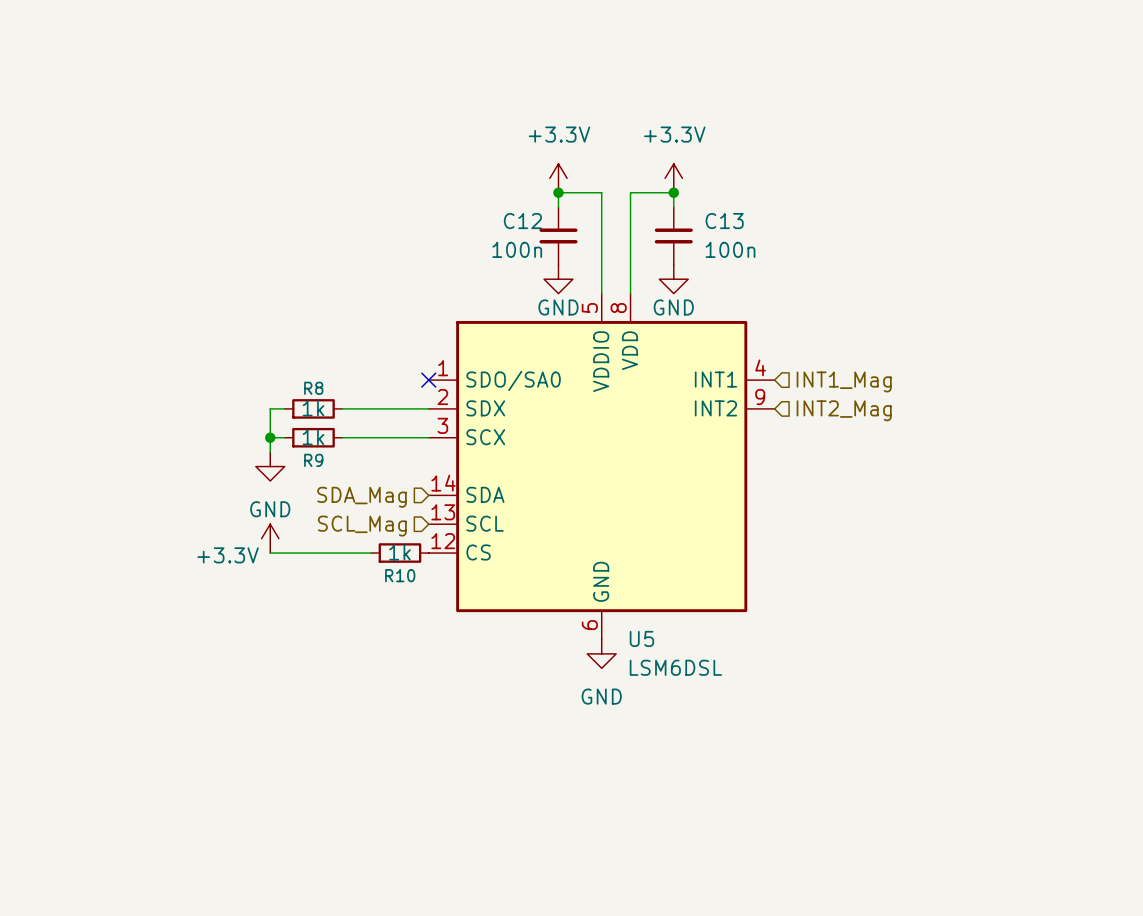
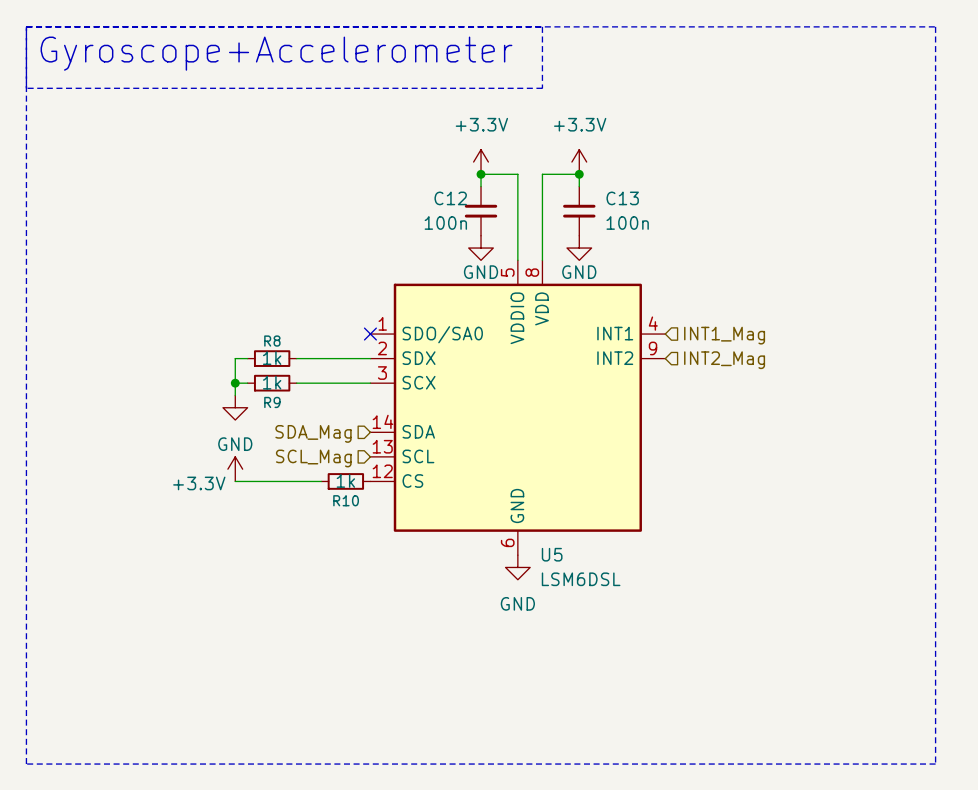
line: none -> (26, 26) (935, 26) (935, 764) (26, 764) (26, 26)
line: none -> (542, 26) (542, 88) (26, 88)
text: none -> Gyroscope+Accelerometer (276, 53)

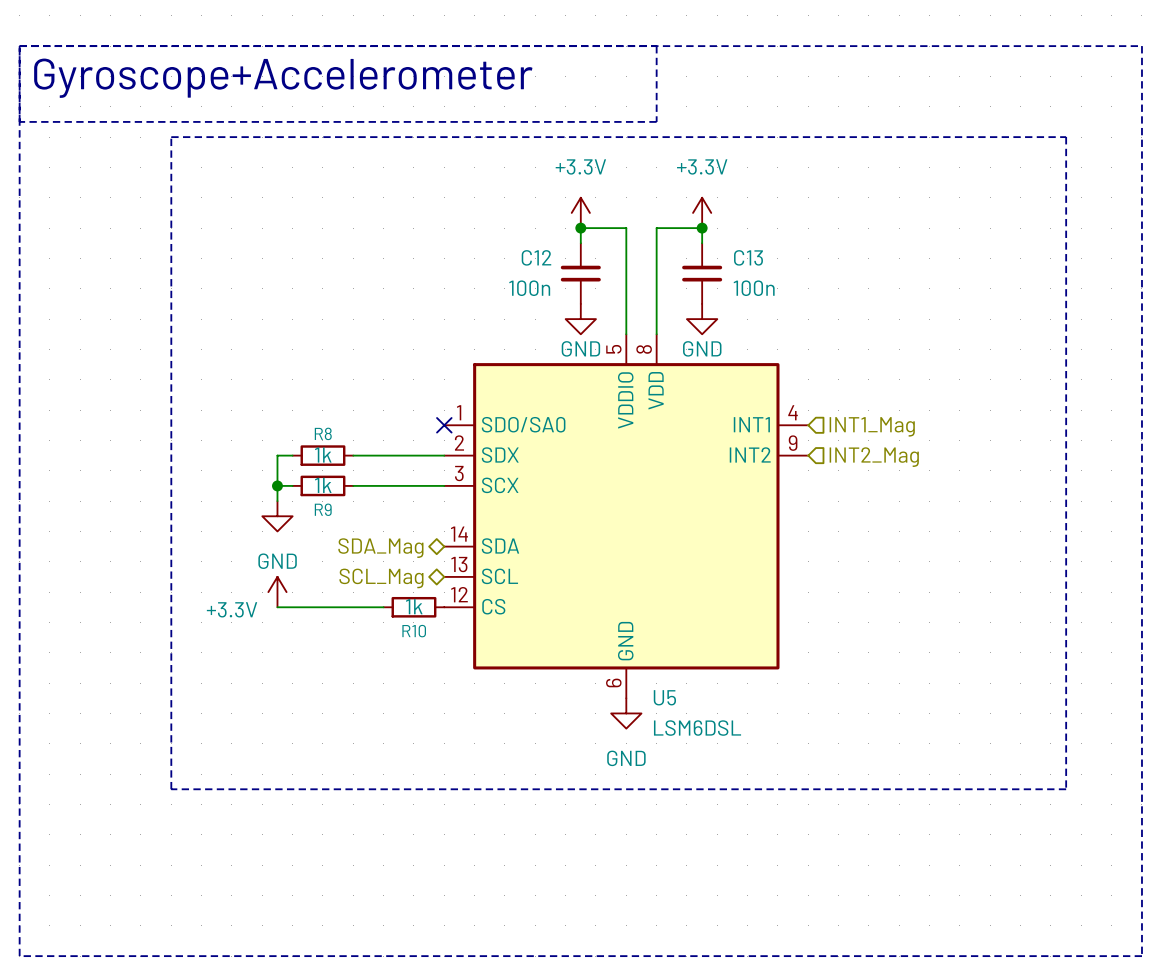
line: none -> (171, 137) (1066, 137) (1066, 789) (171, 789) (171, 137)
hierarchical label shape: input (313, 433) -> bidirectional (380, 548)
hierarchical label shape: input (313, 458) -> bidirectional (381, 578)

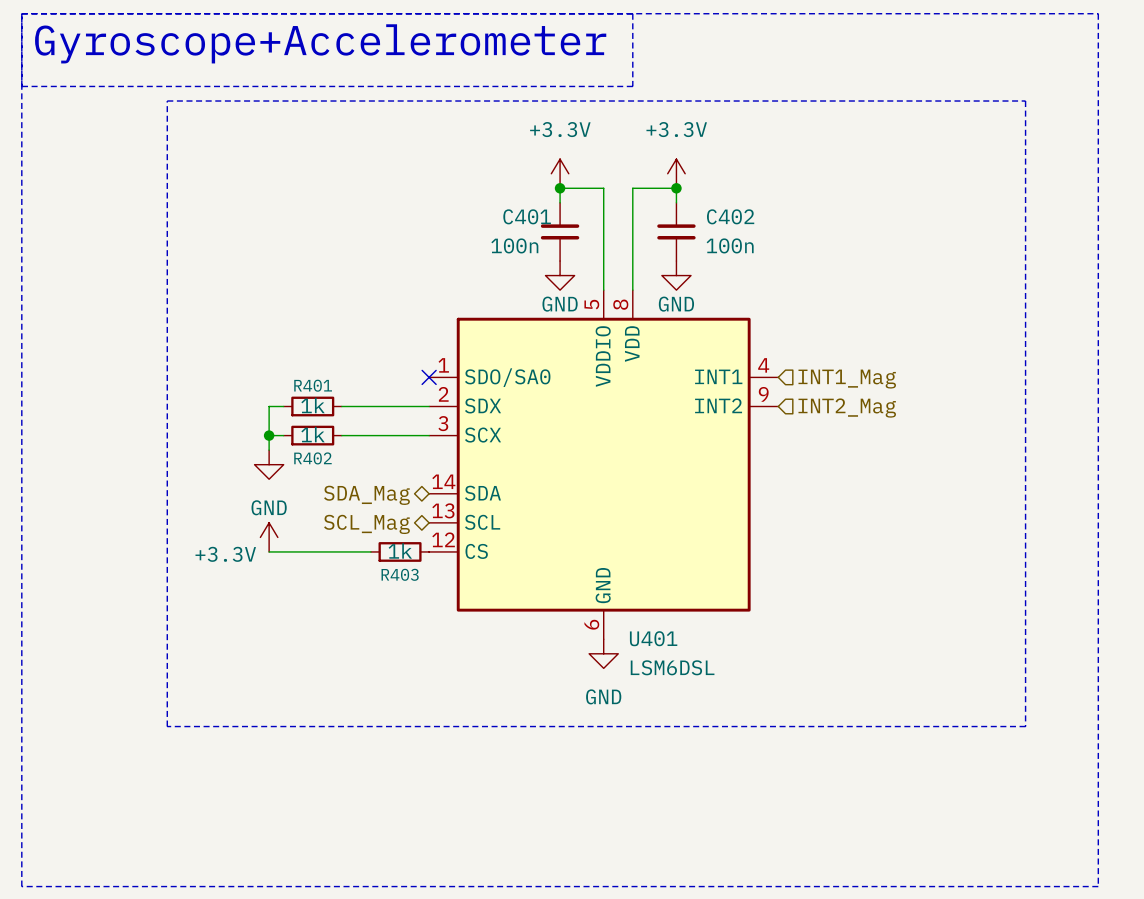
C12 name: C12 (536, 257) -> C401 (527, 216)
C13 name: C13 (748, 257) -> C402 (730, 216)
R8 name: R8 (323, 433) -> R401 (313, 385)
R9 name: R9 (323, 509) -> R402 (312, 458)
R10 name: R10 (414, 631) -> R403 (400, 574)
U5 name: U5 (664, 697) -> U401 (653, 638)

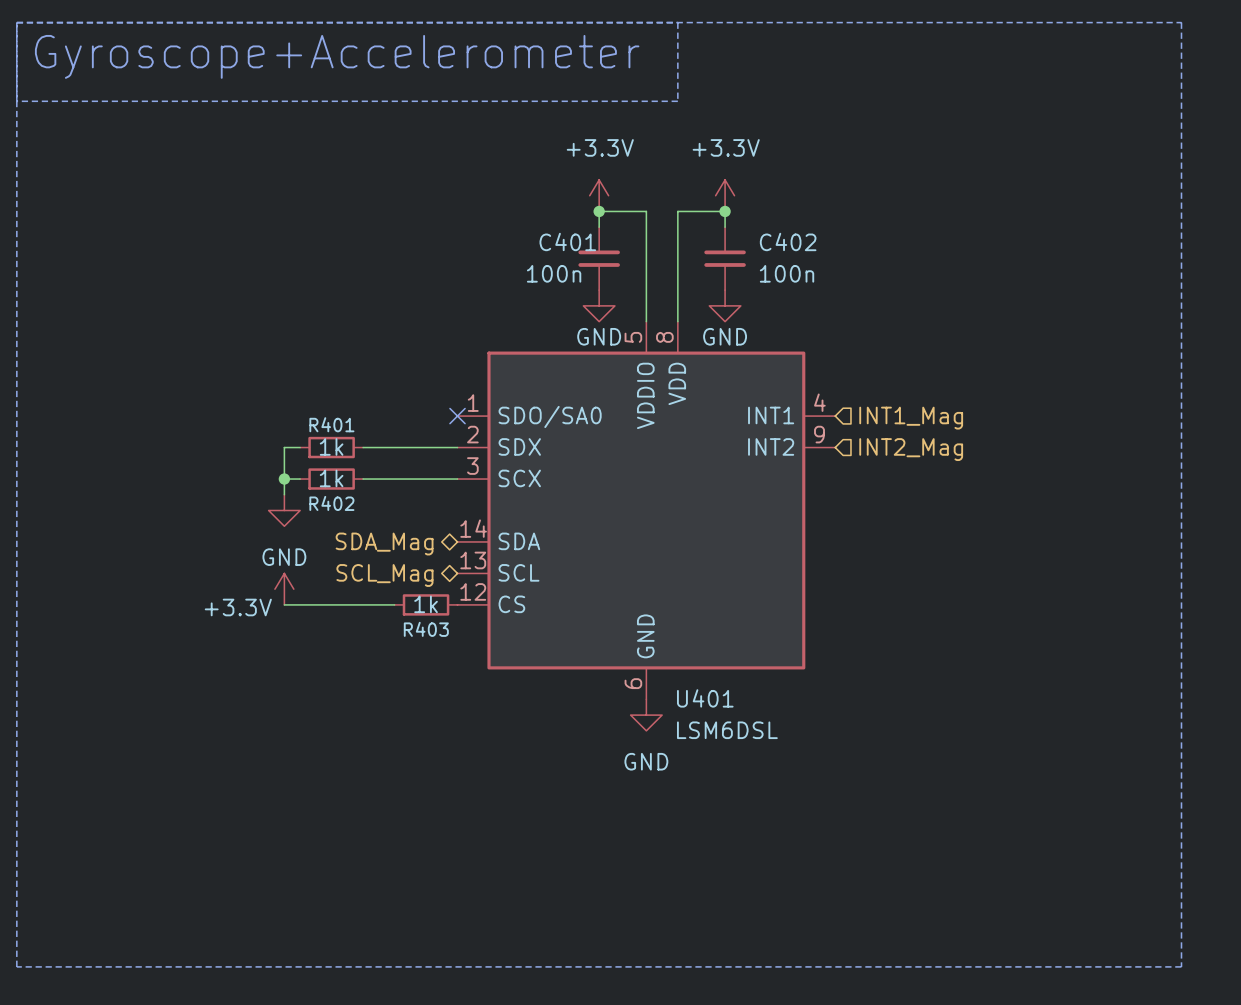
line: (167, 101) (1025, 101) (1025, 726) (167, 726) (167, 101) -> none

